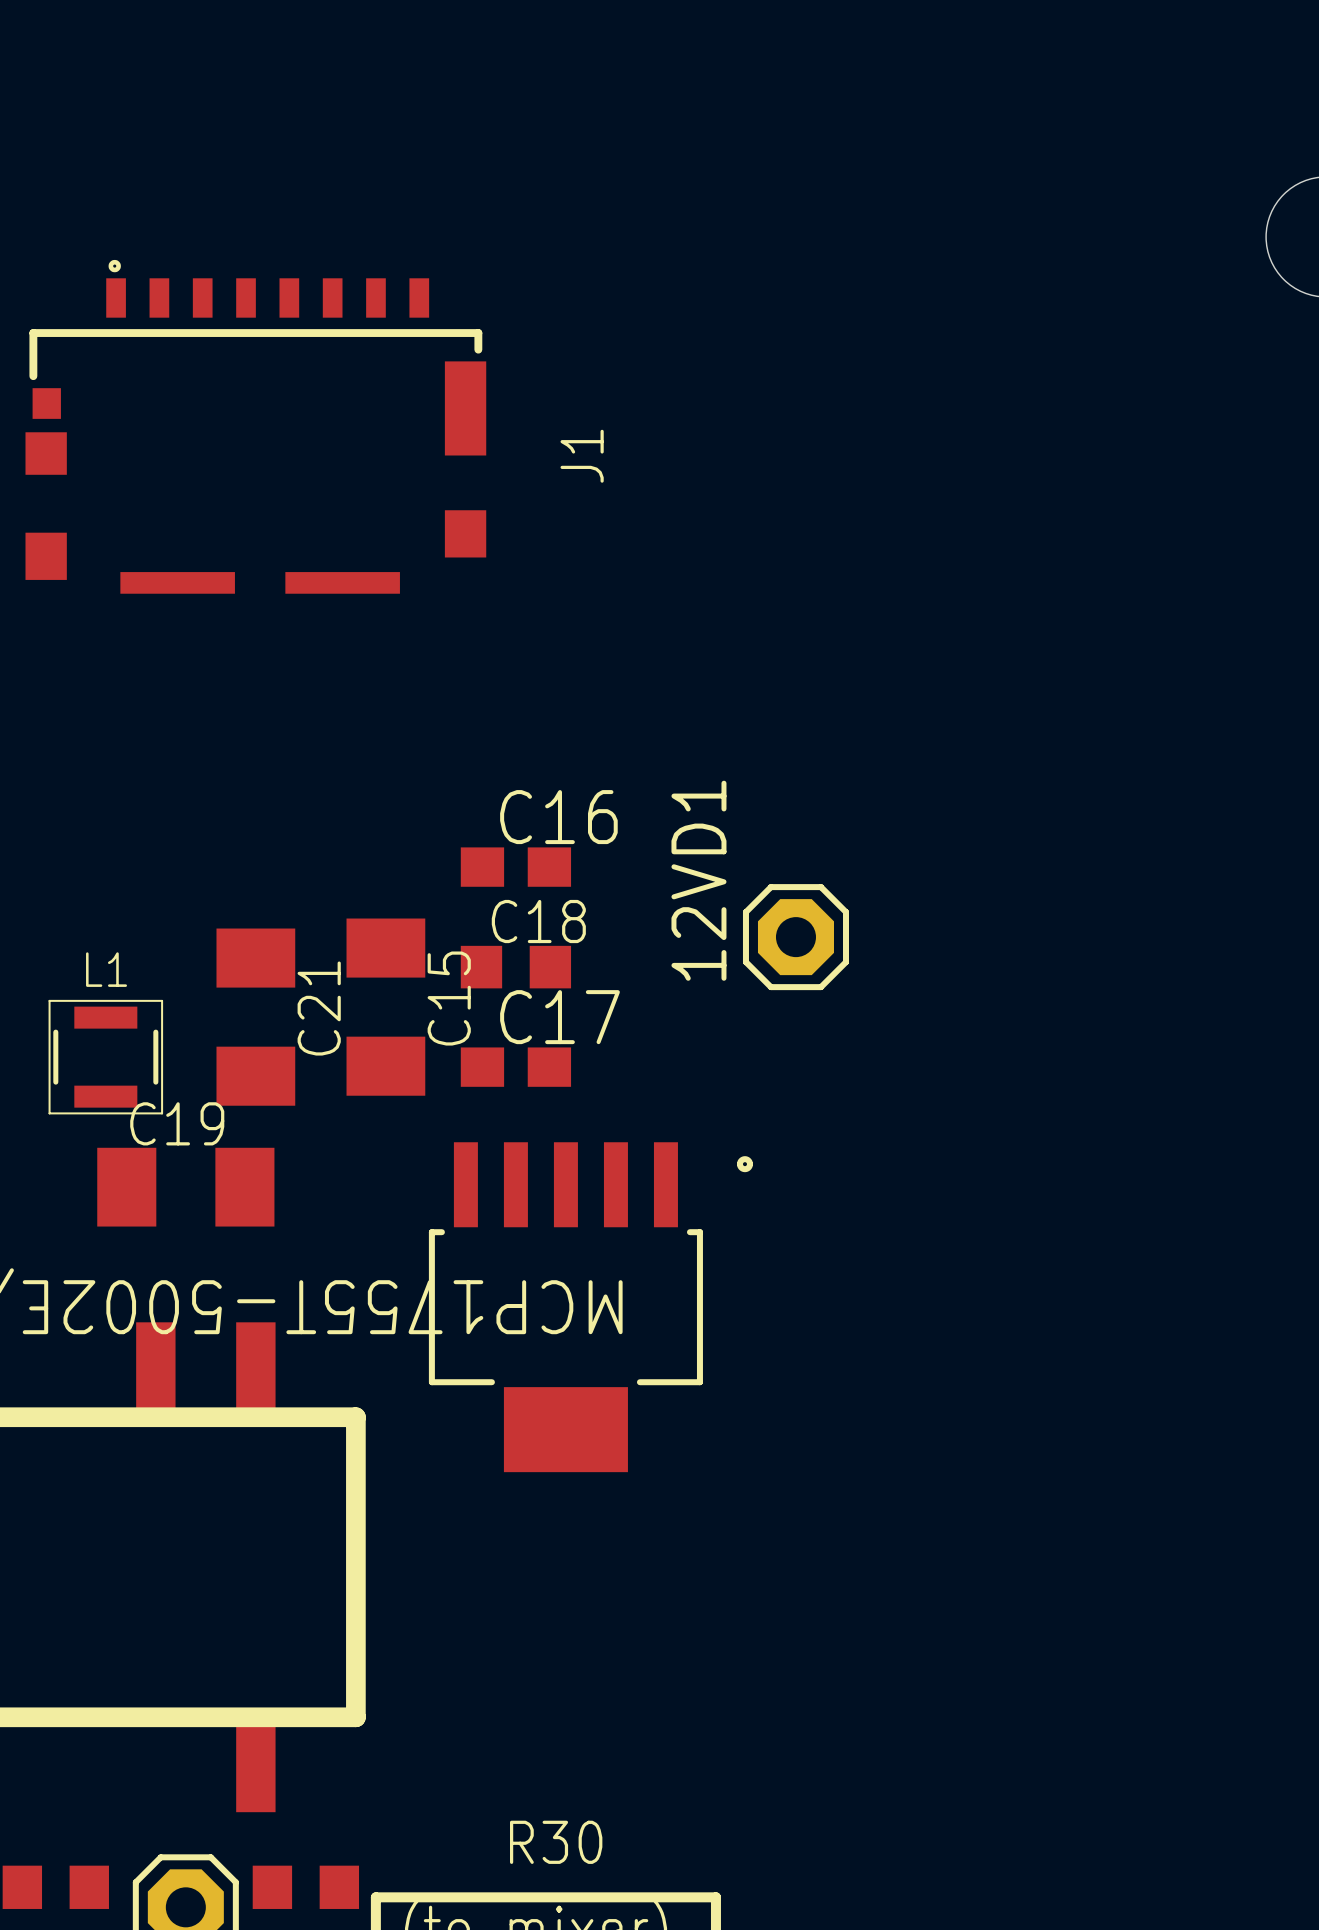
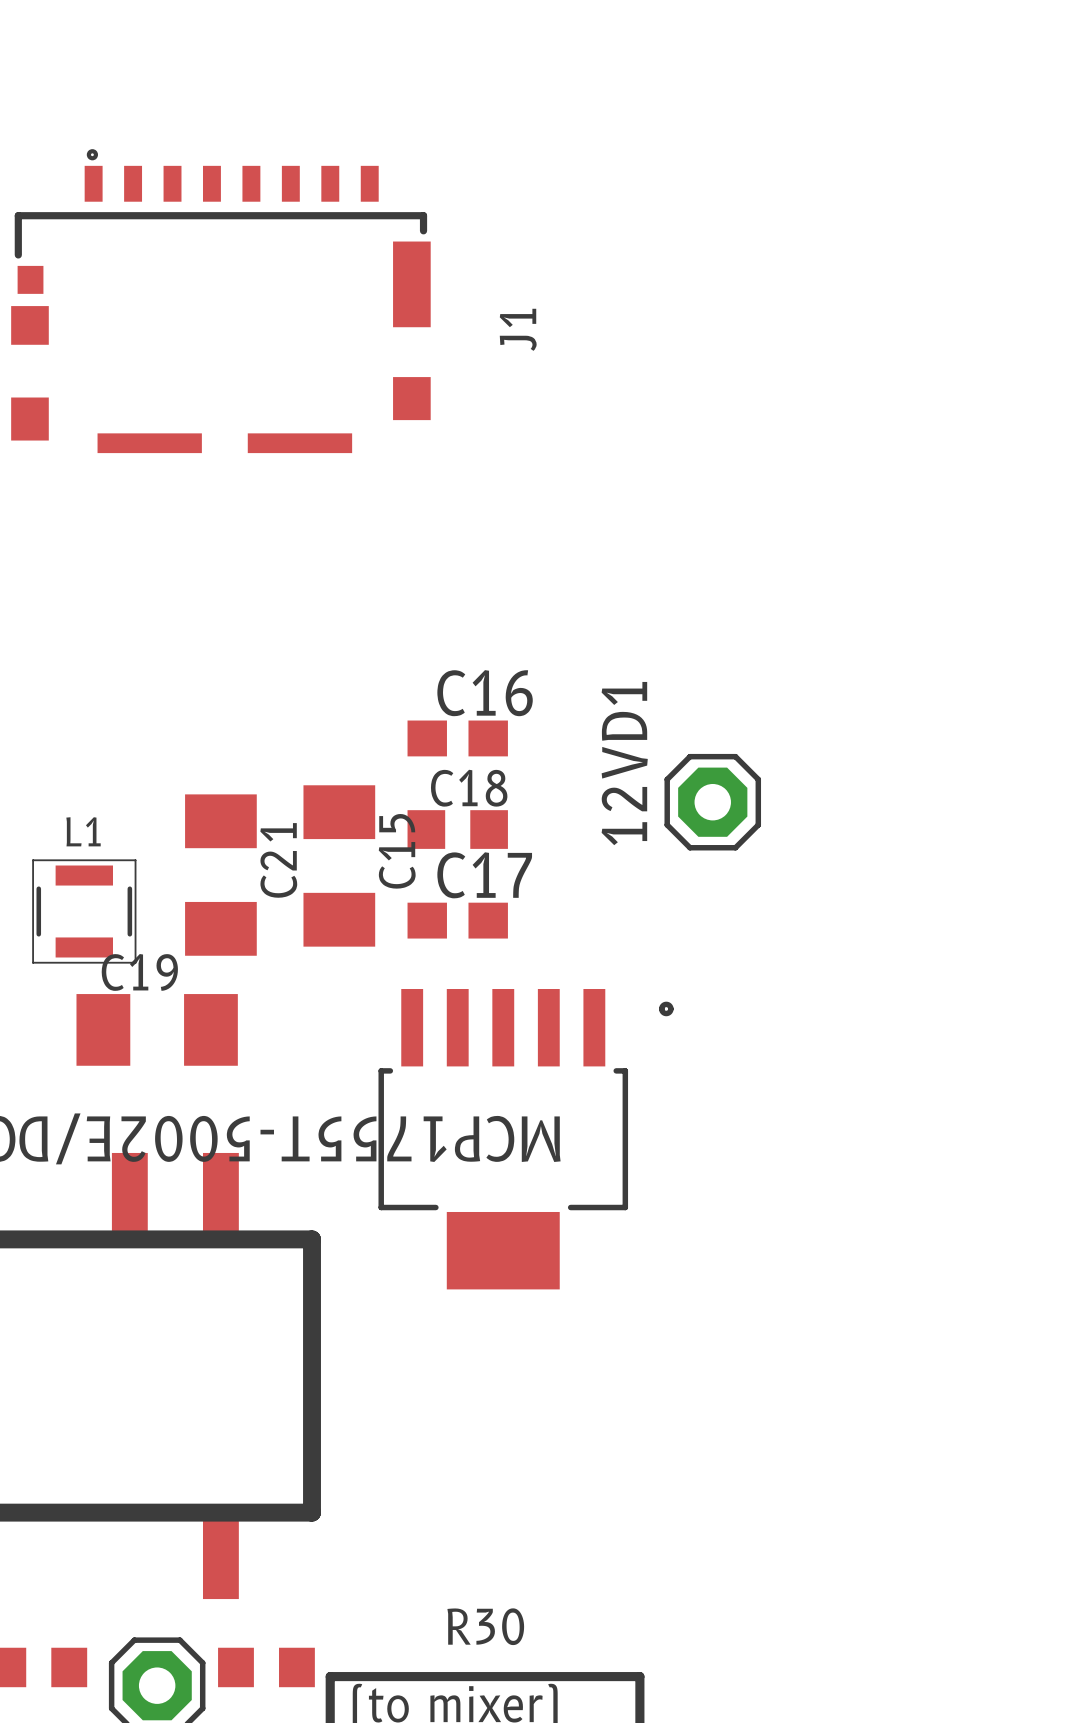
J1 position: (255, 426) -> (220, 301)

